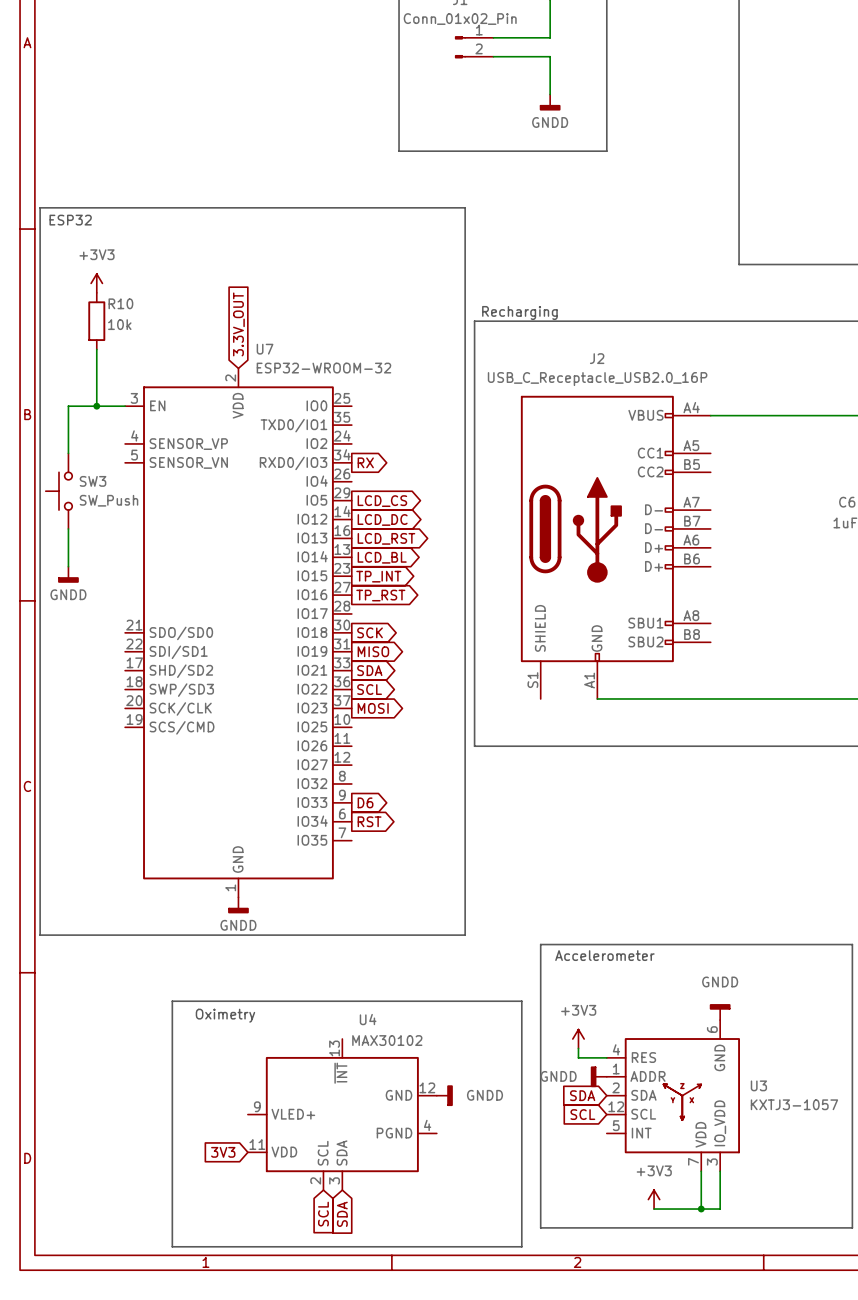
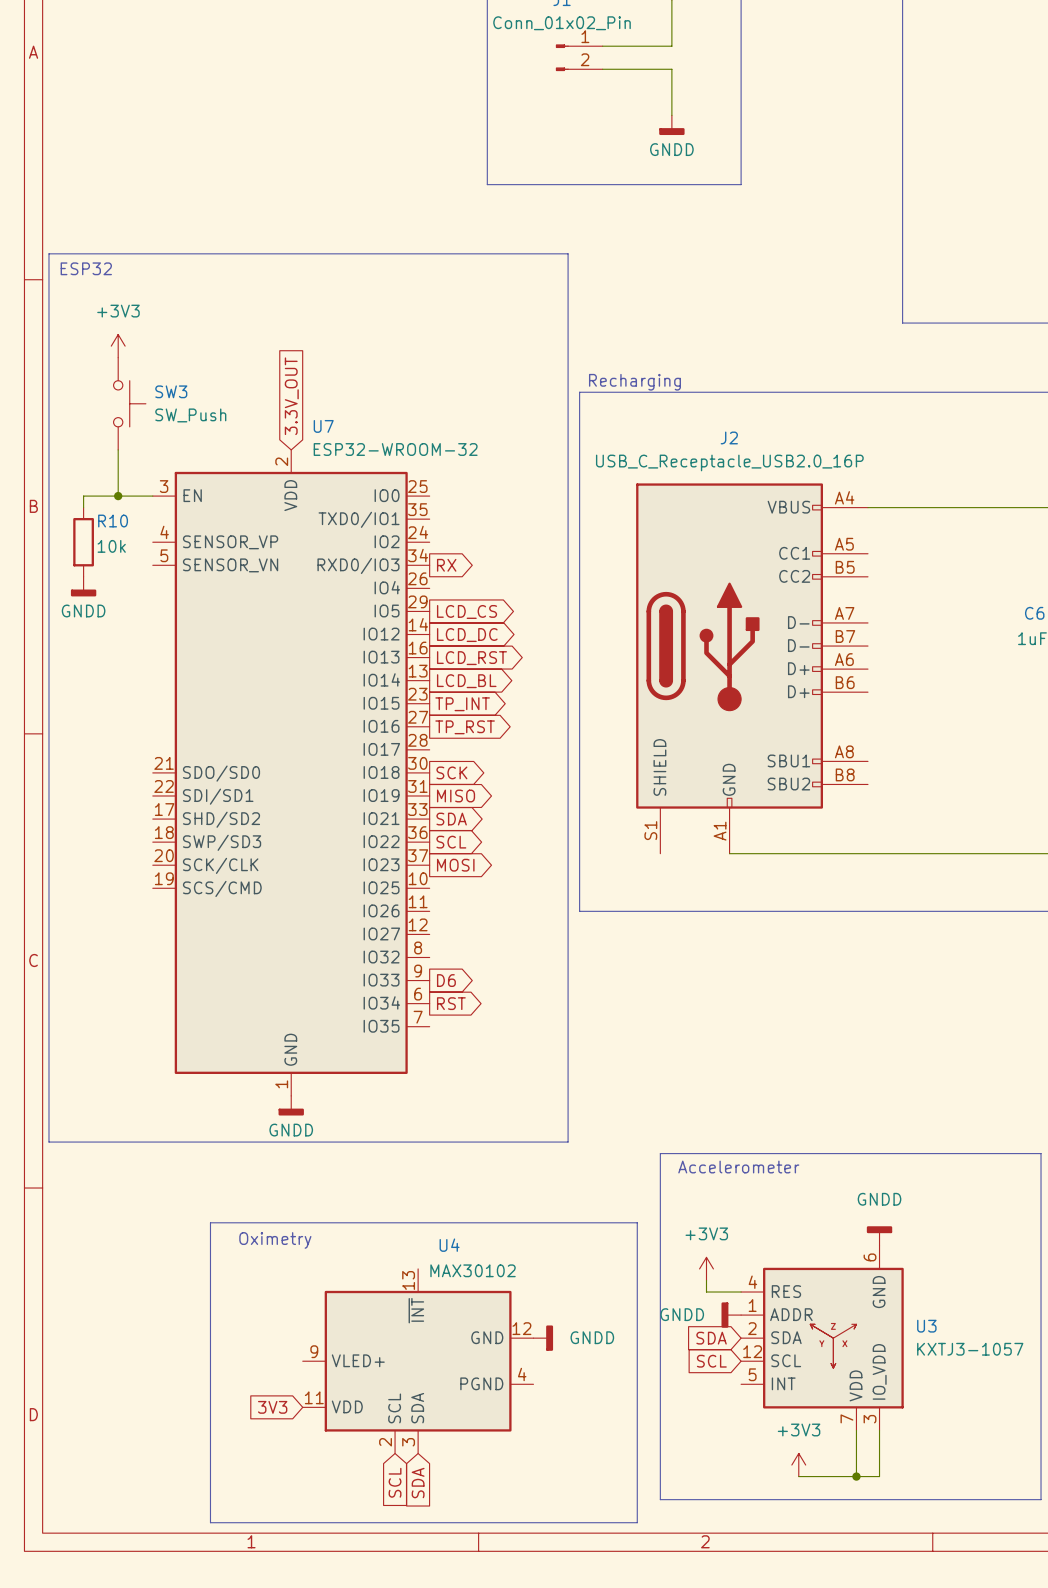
R10 position: (96, 321) -> (83, 542)
wire: (68, 415) (68, 453) -> none
SW3 rotation: 0° (59, 491) -> 180° (129, 403)
SW3 position: (59, 491) -> (129, 403)
wire: (68, 528) (68, 566) -> none
power symbol position: GNDD (68, 574) -> GNDD (83, 586)

